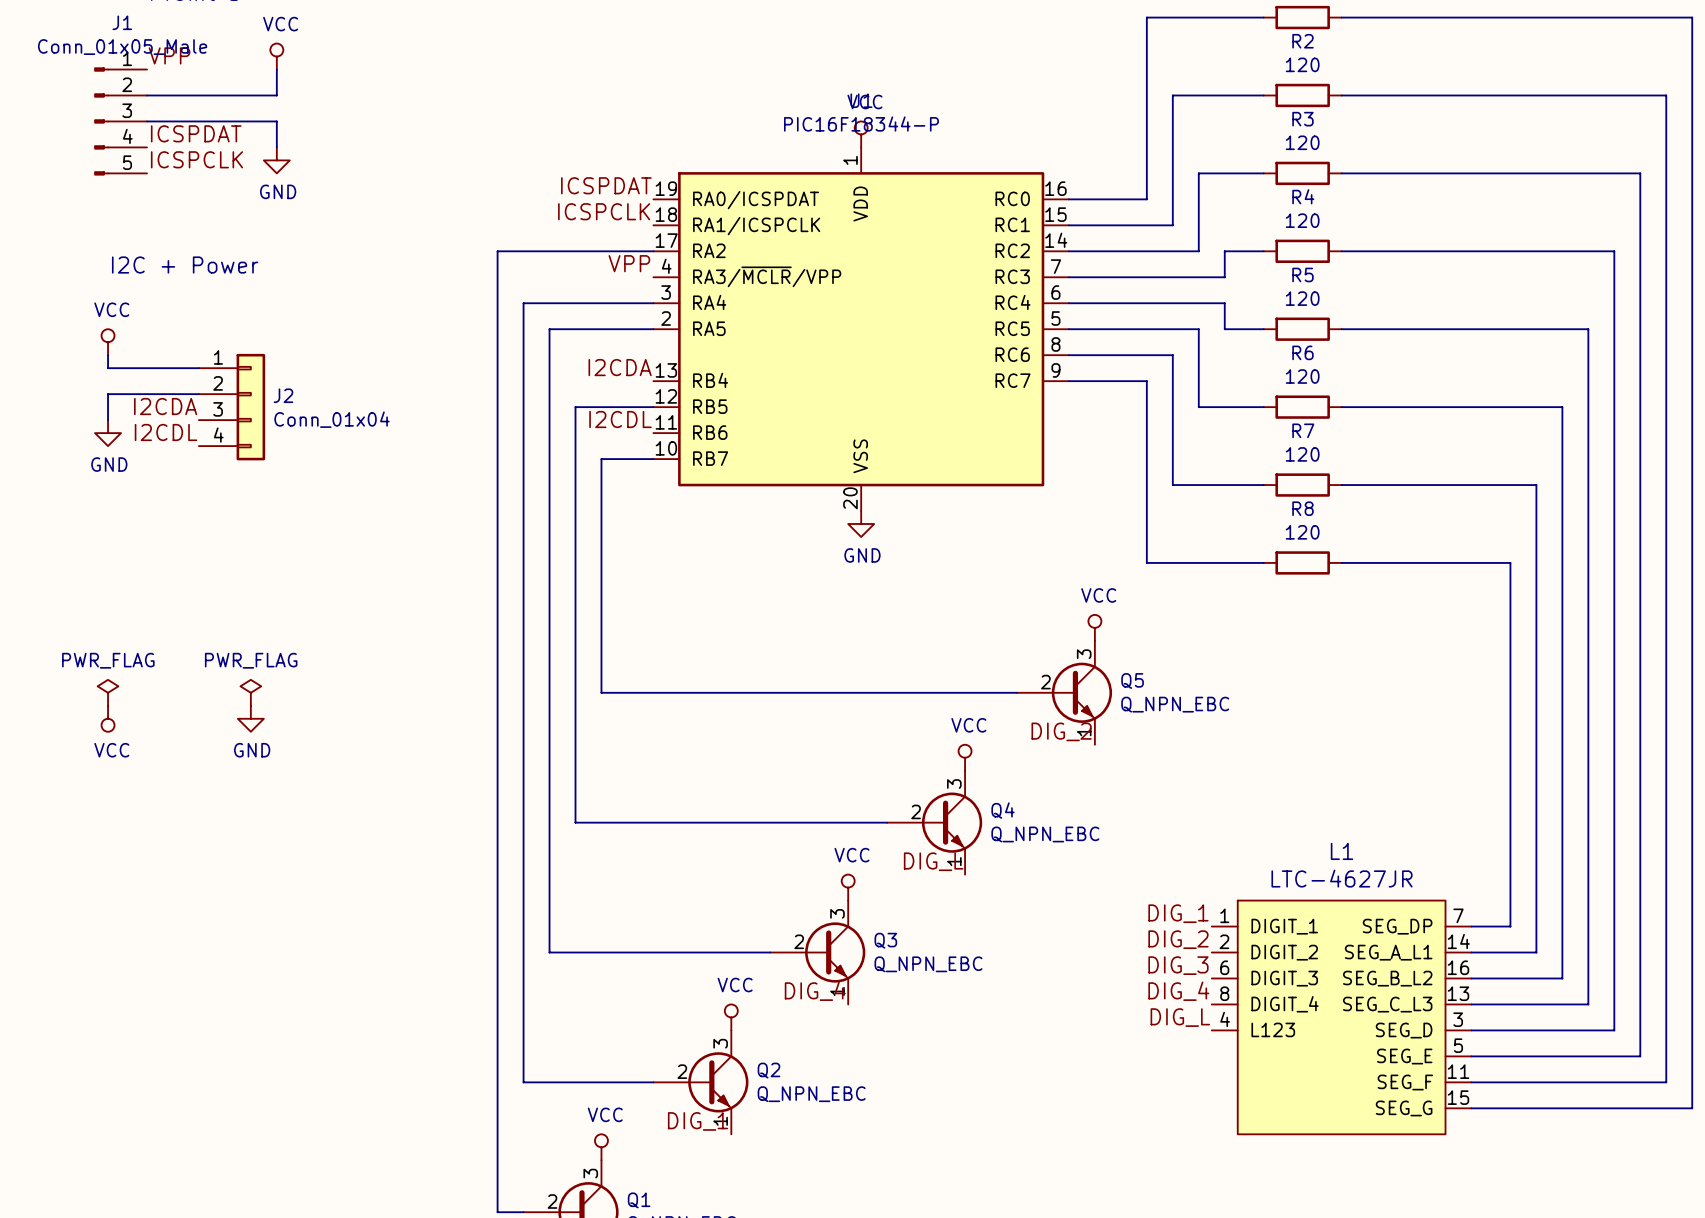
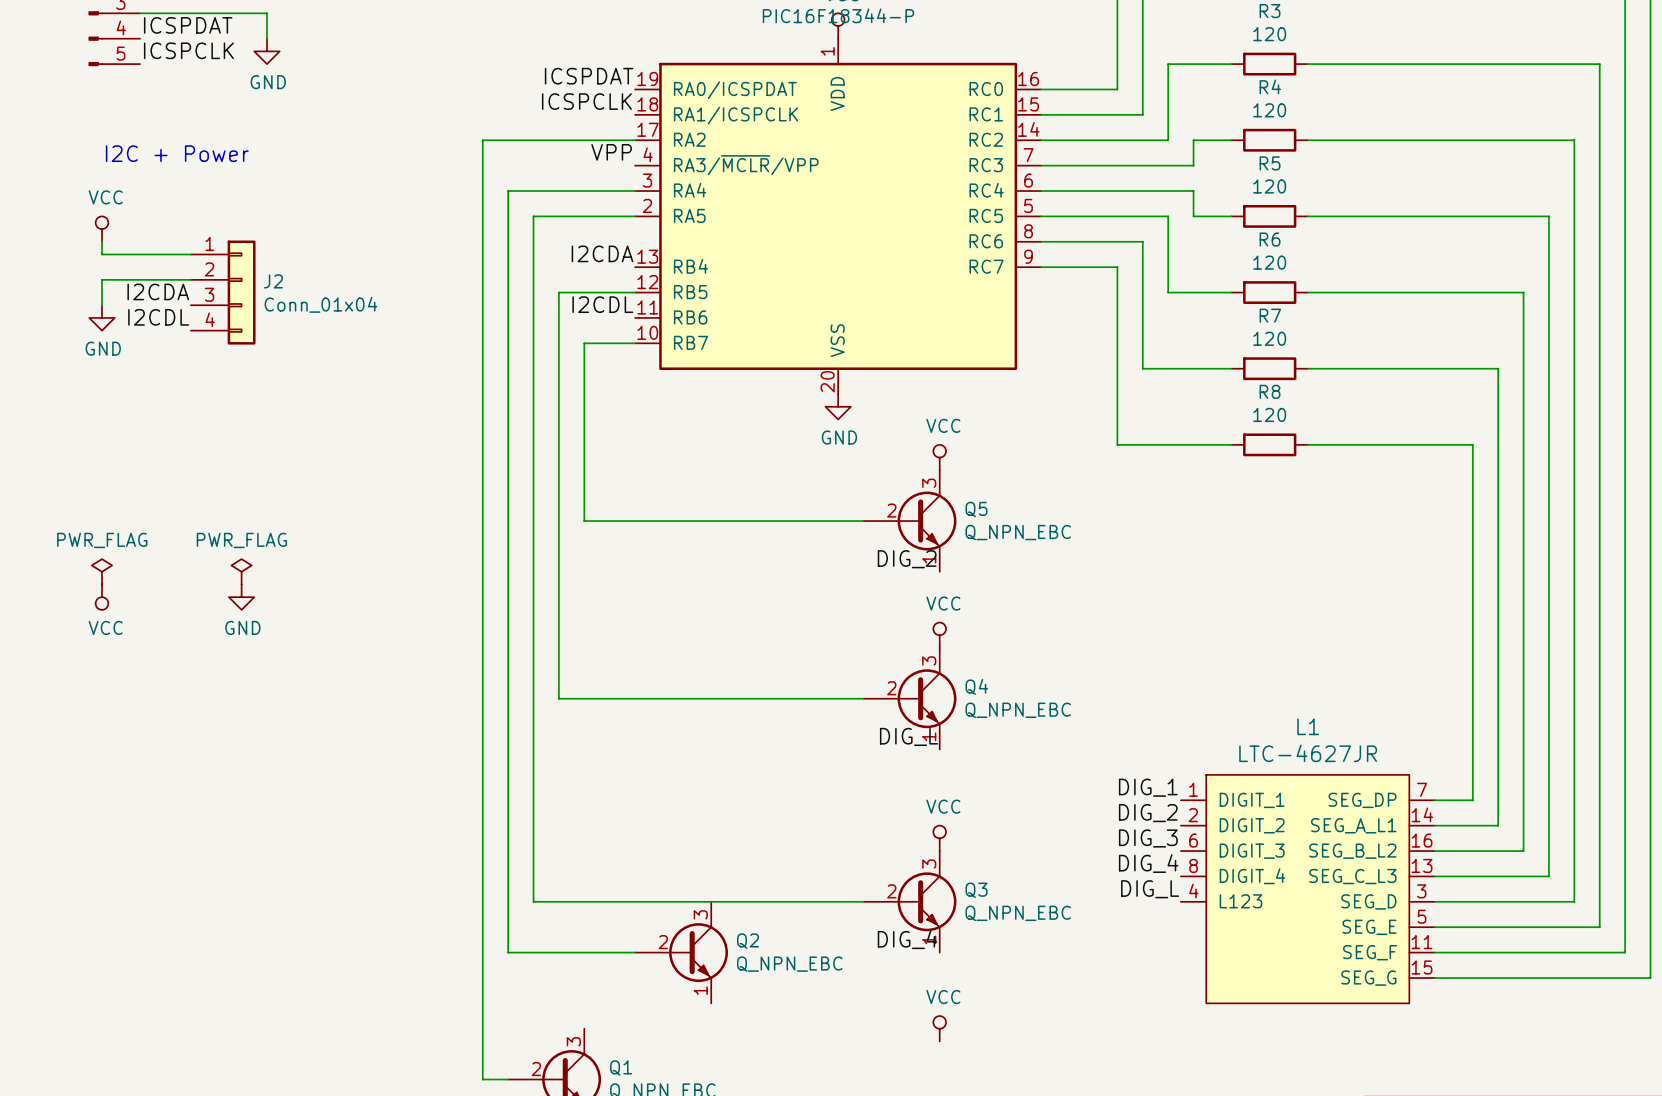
power symbol position: VCC (1094, 627) -> VCC (939, 457)
wire: (601, 640) (601, 692) (1016, 692) -> (584, 521) (863, 521)
Q5 position: (1064, 692) -> (910, 521)
label position: DIG_2 (1061, 731) -> DIG_2 (907, 559)
power symbol: VCC (848, 887) -> none
wire: (549, 952) (770, 952) -> (533, 825) (533, 901) (863, 901)
Q3 position: (817, 952) -> (910, 901)
power symbol: none -> VCC (939, 838)
label position: DIG_4 (815, 991) -> DIG_4 (907, 939)
power symbol: VCC (731, 1017) -> none
label: DIG_1 (698, 1121) -> none
power symbol: VCC (601, 1147) -> none
power symbol: none -> VCC (939, 1028)

